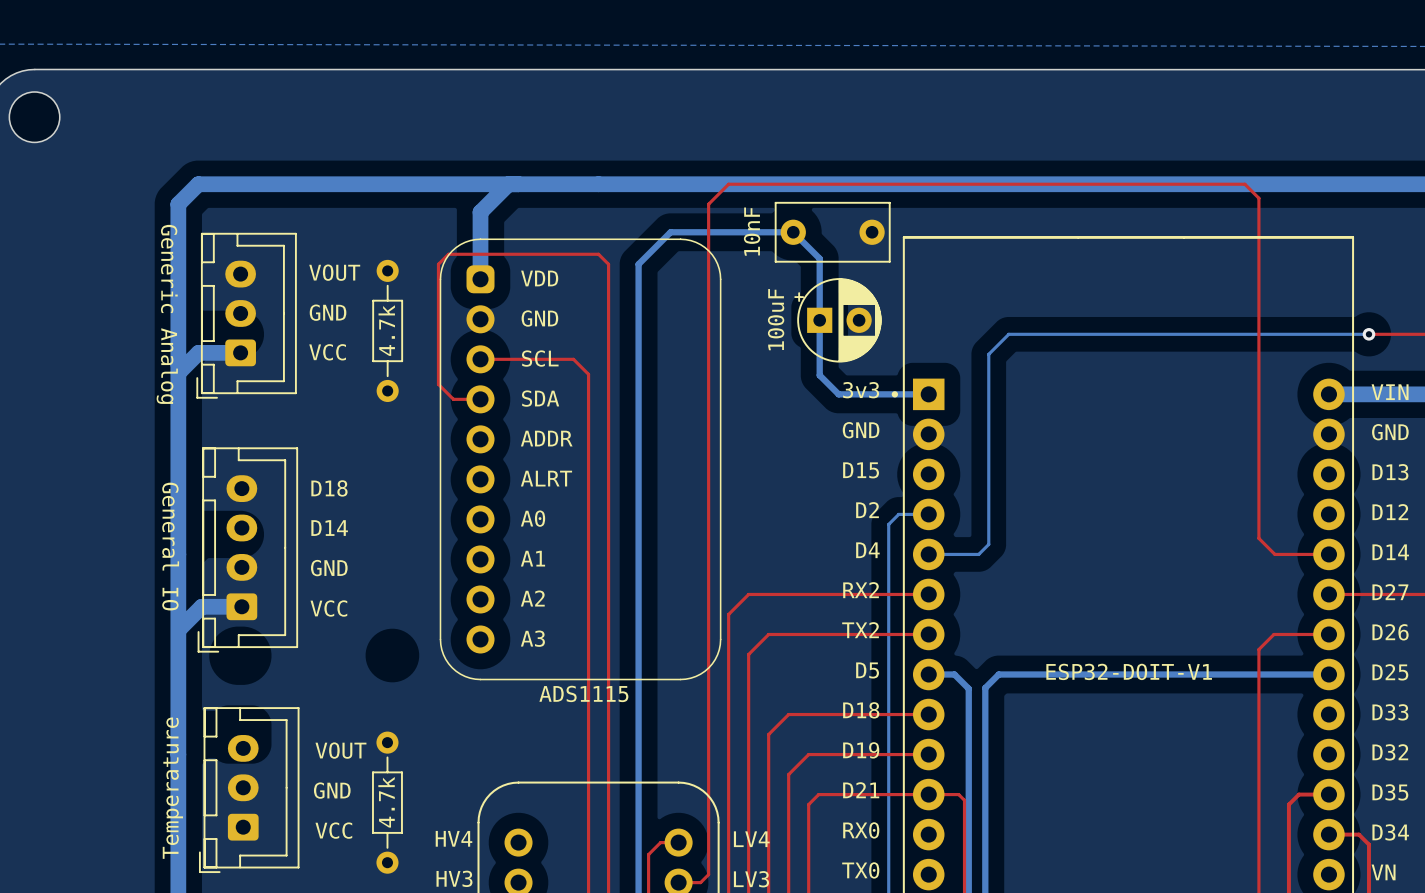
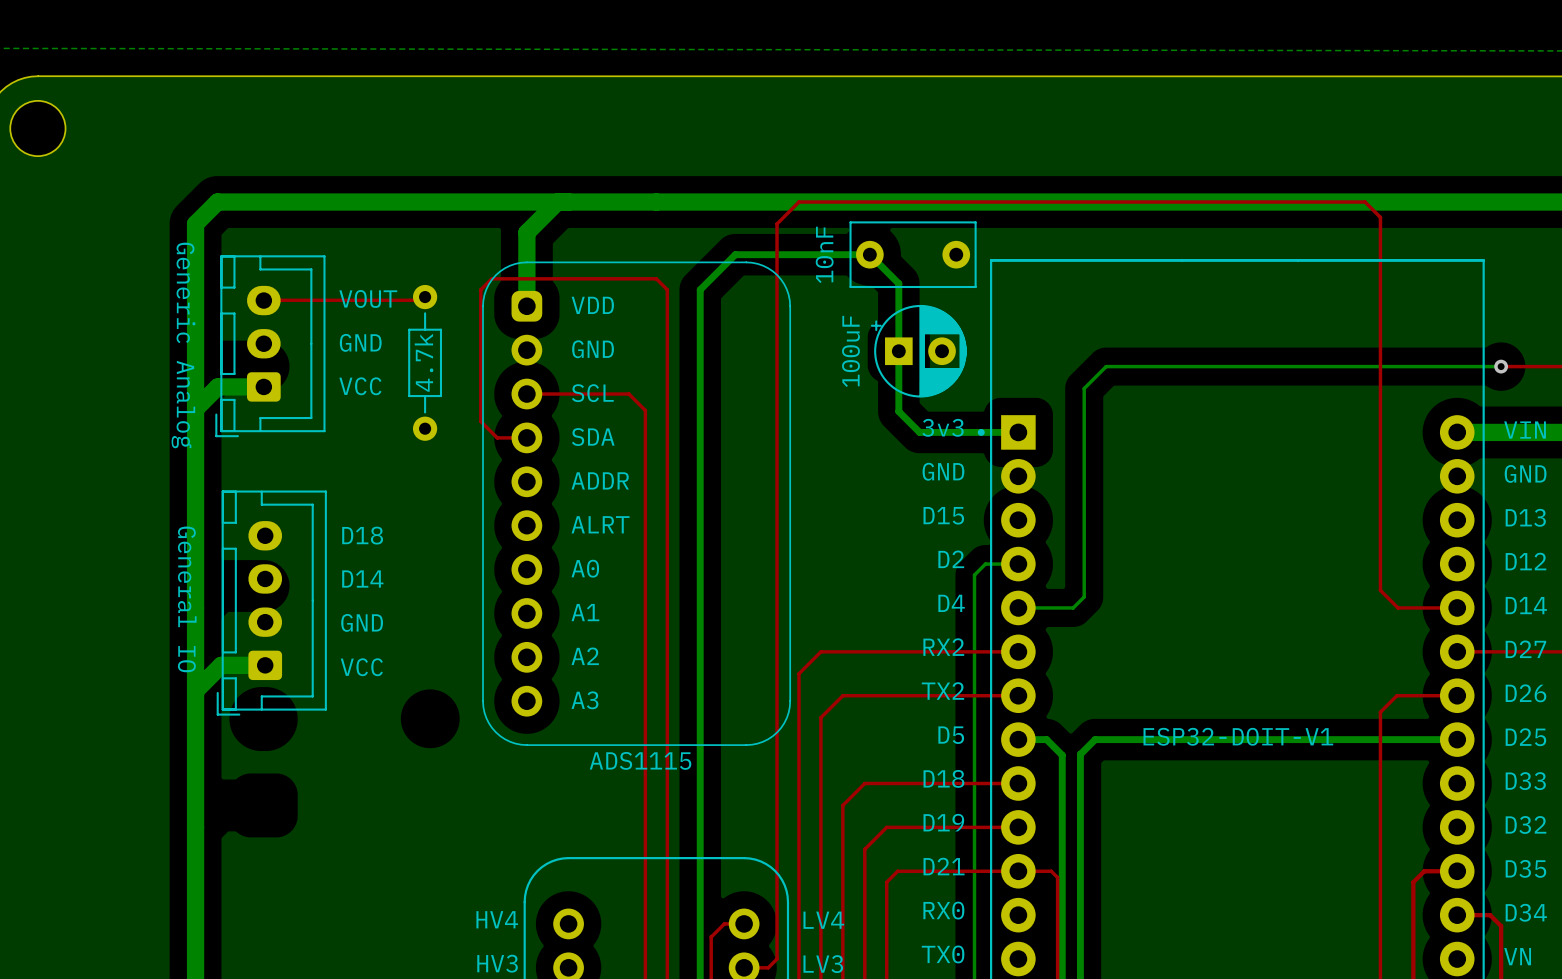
top track: none -> (264, 300) (430, 300)
text: VOUT (340, 750) -> none
part: Temperature (249, 790) -> none
text: GND (332, 790) -> none
part: 4.7k (387, 802) -> none
text: VCC (333, 830) -> none

